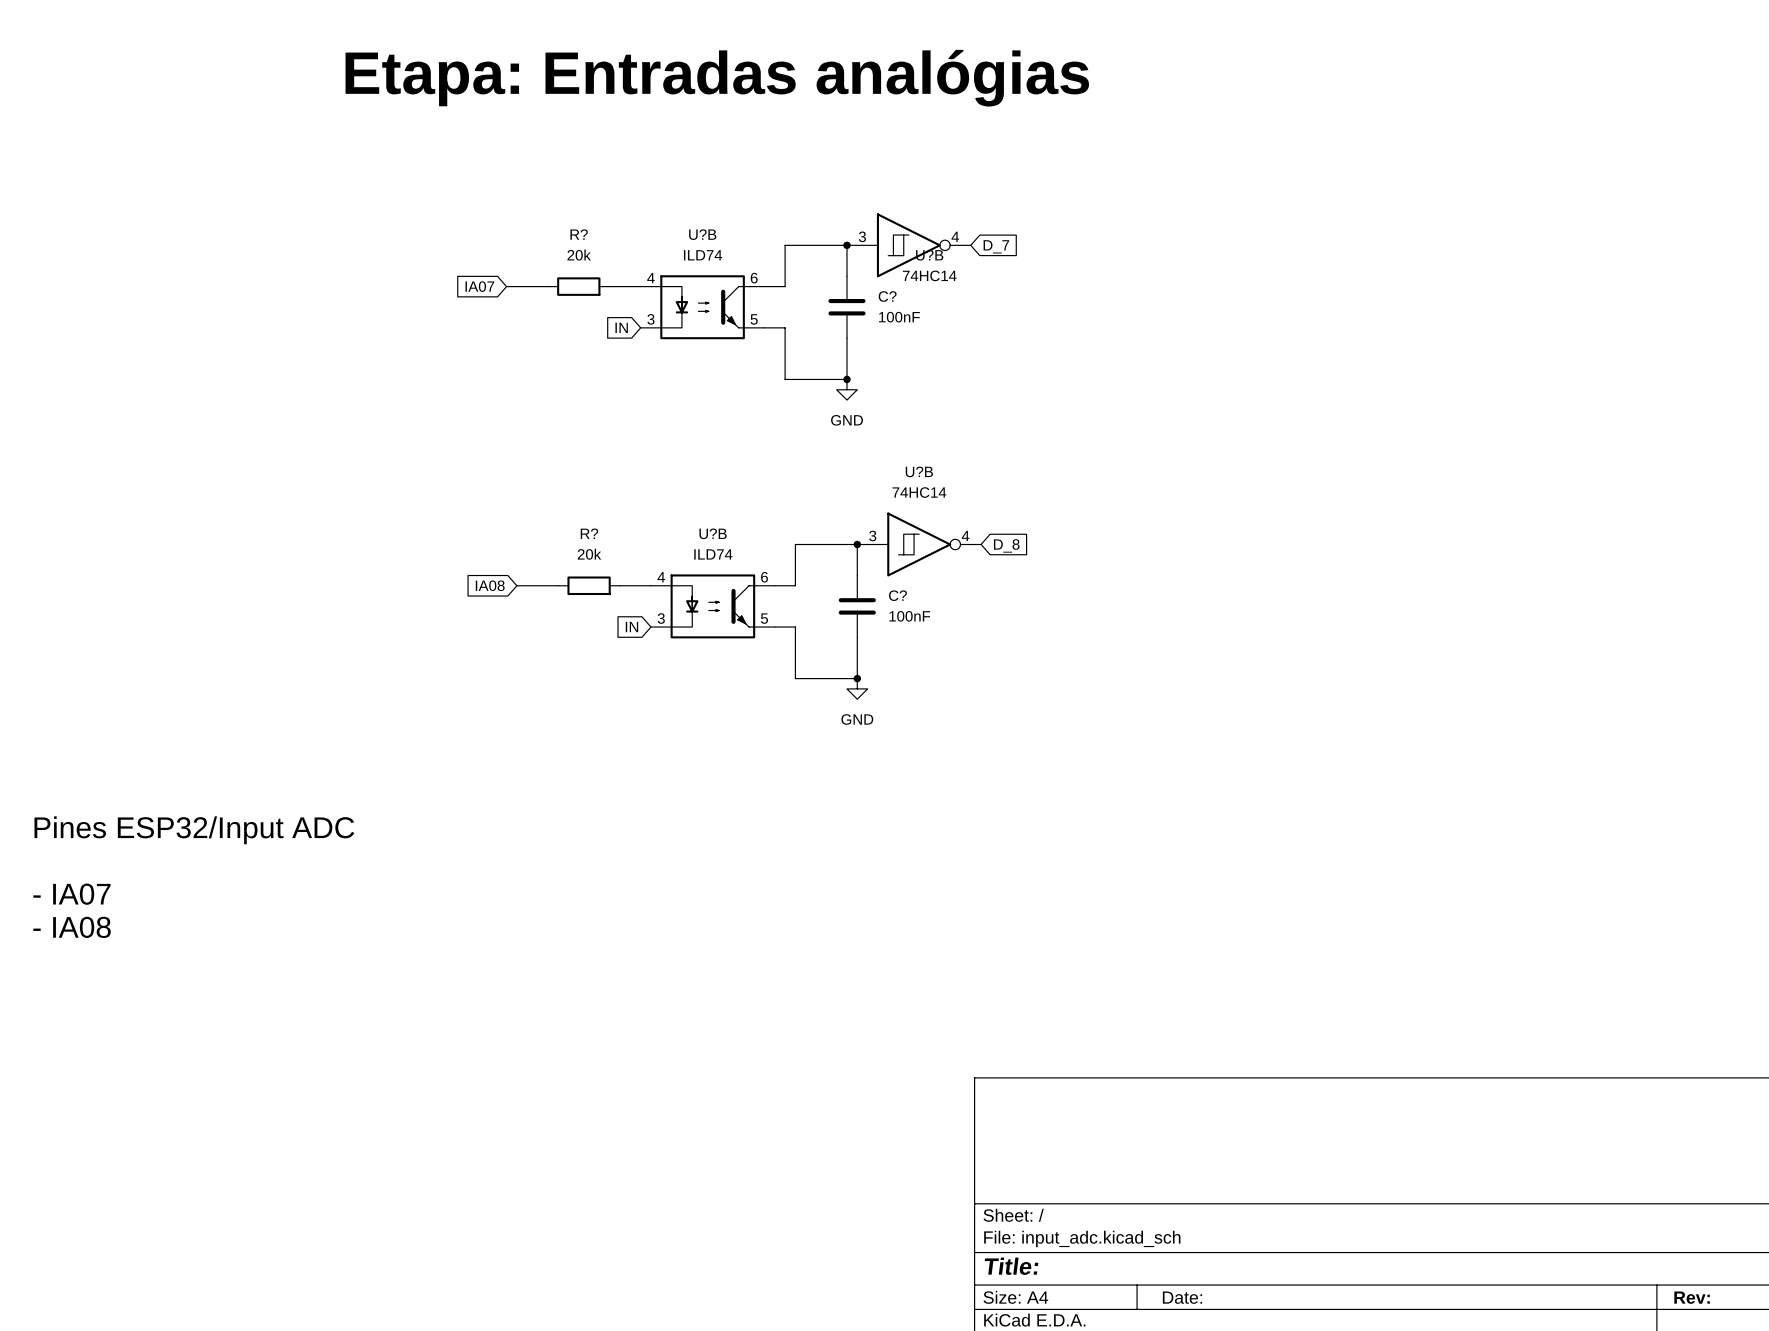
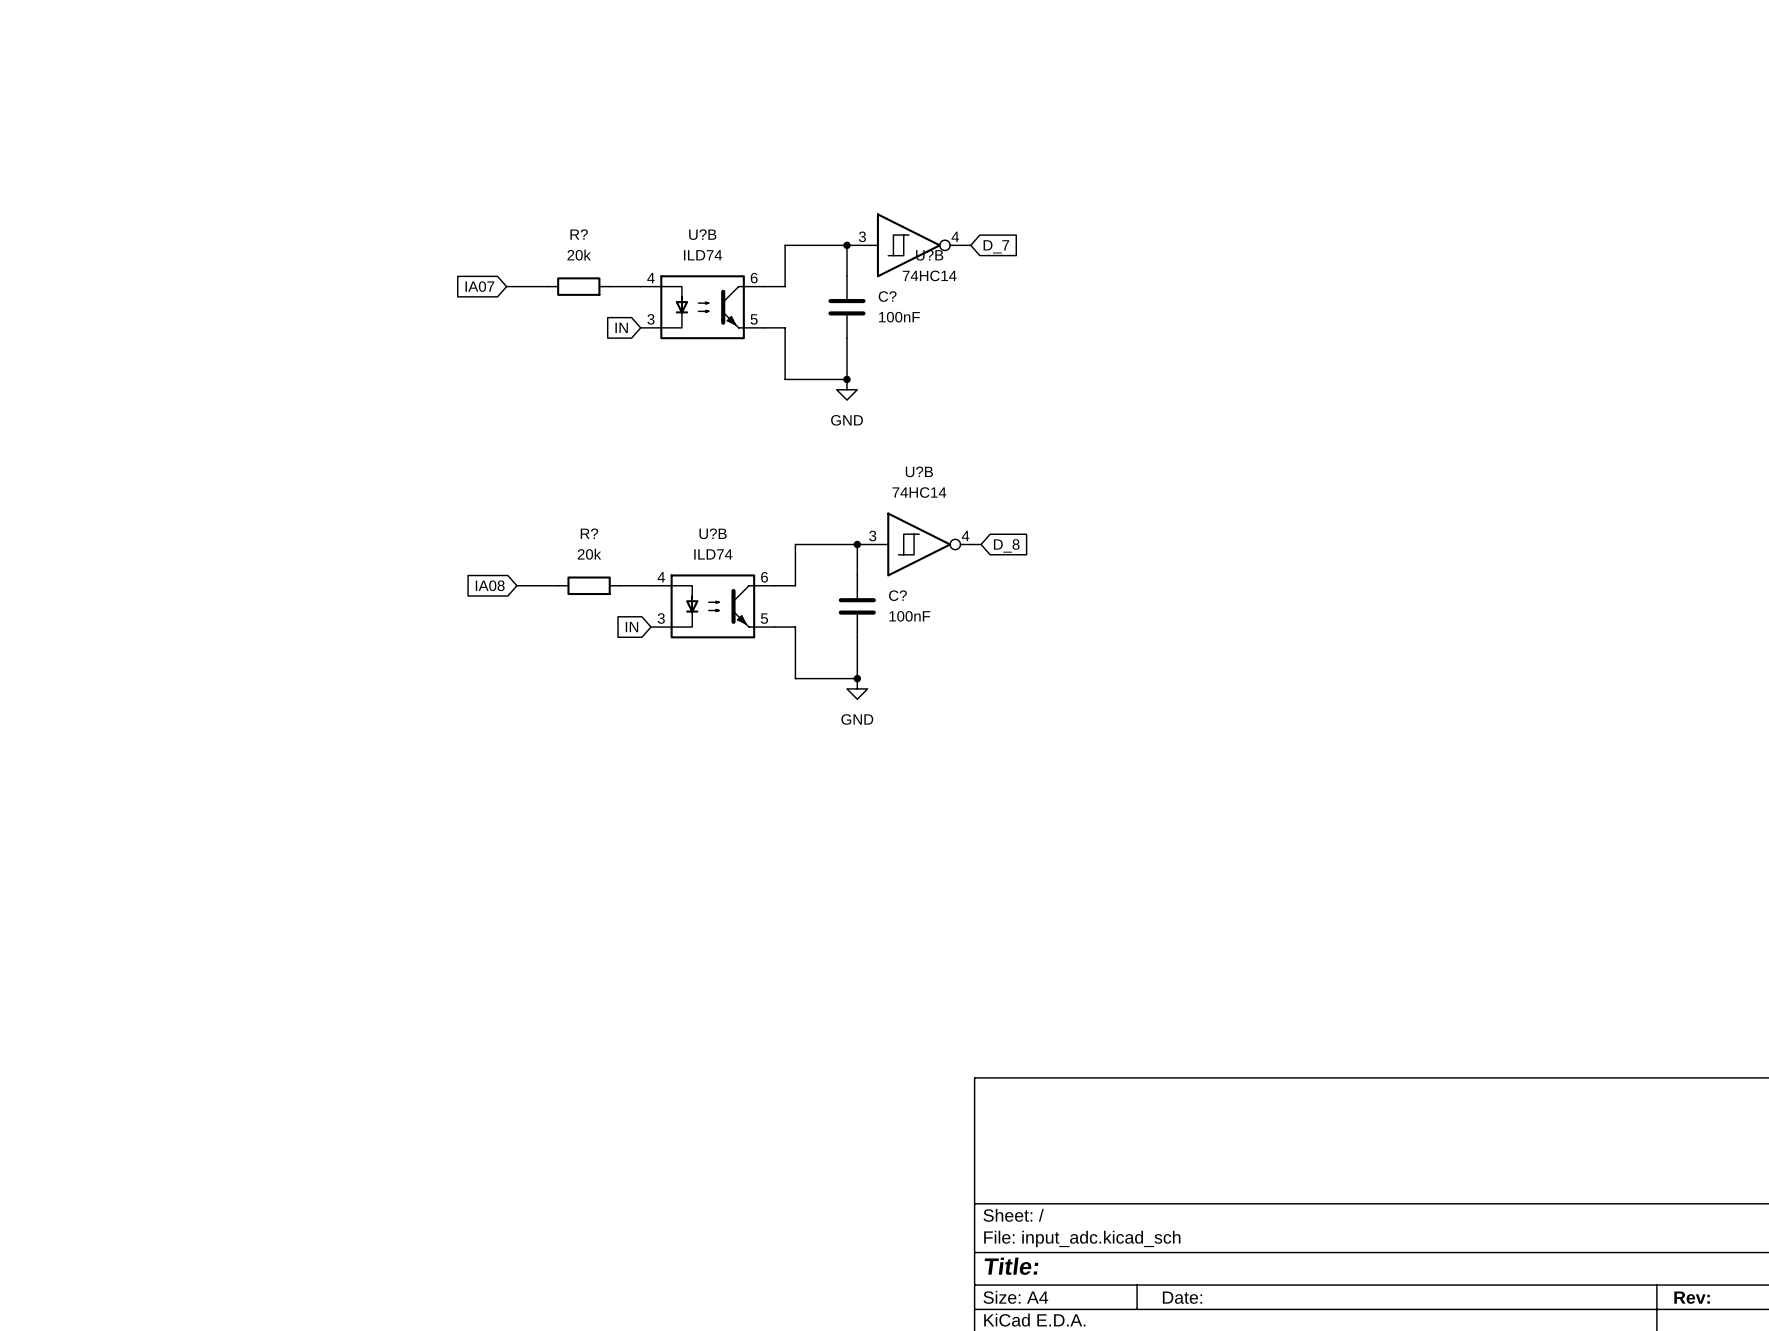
text: Etapa: Entradas analógias (717, 78) -> none
text: Pines ESP32/Input ADC (194, 830) -> none
text: - IA07 (71, 894) -> none
text: - IA08 (72, 927) -> none

